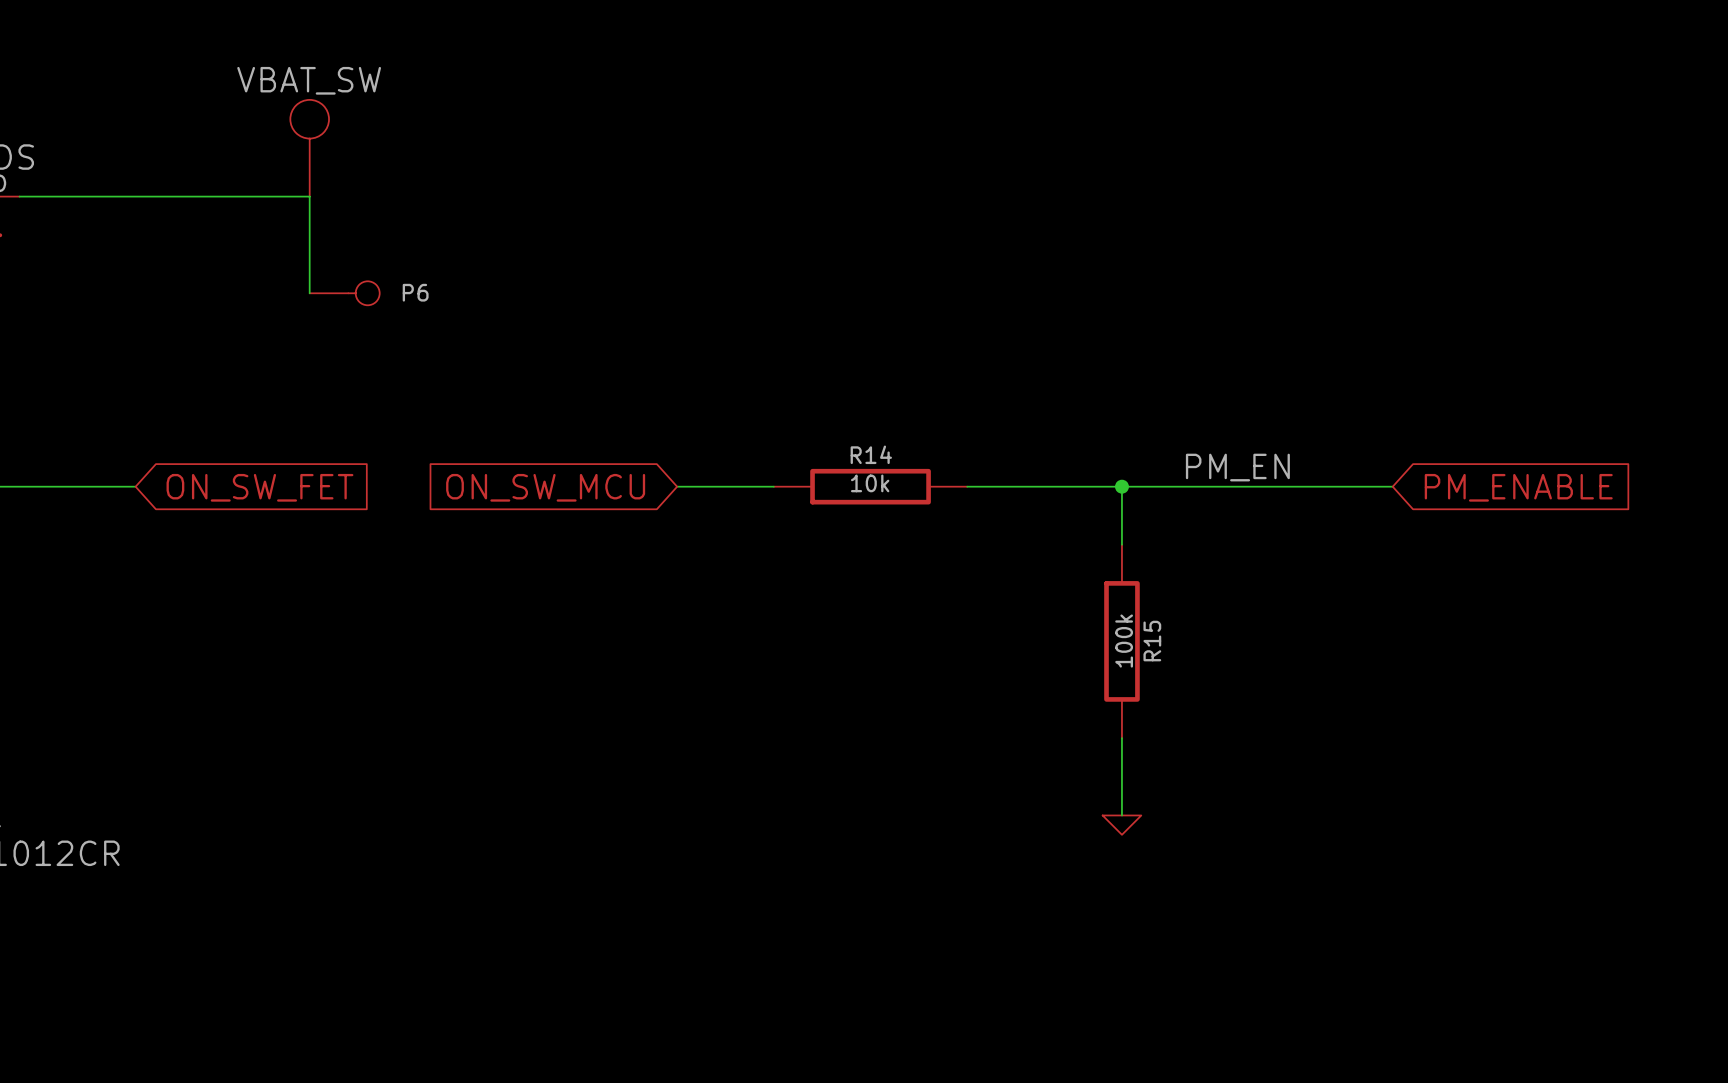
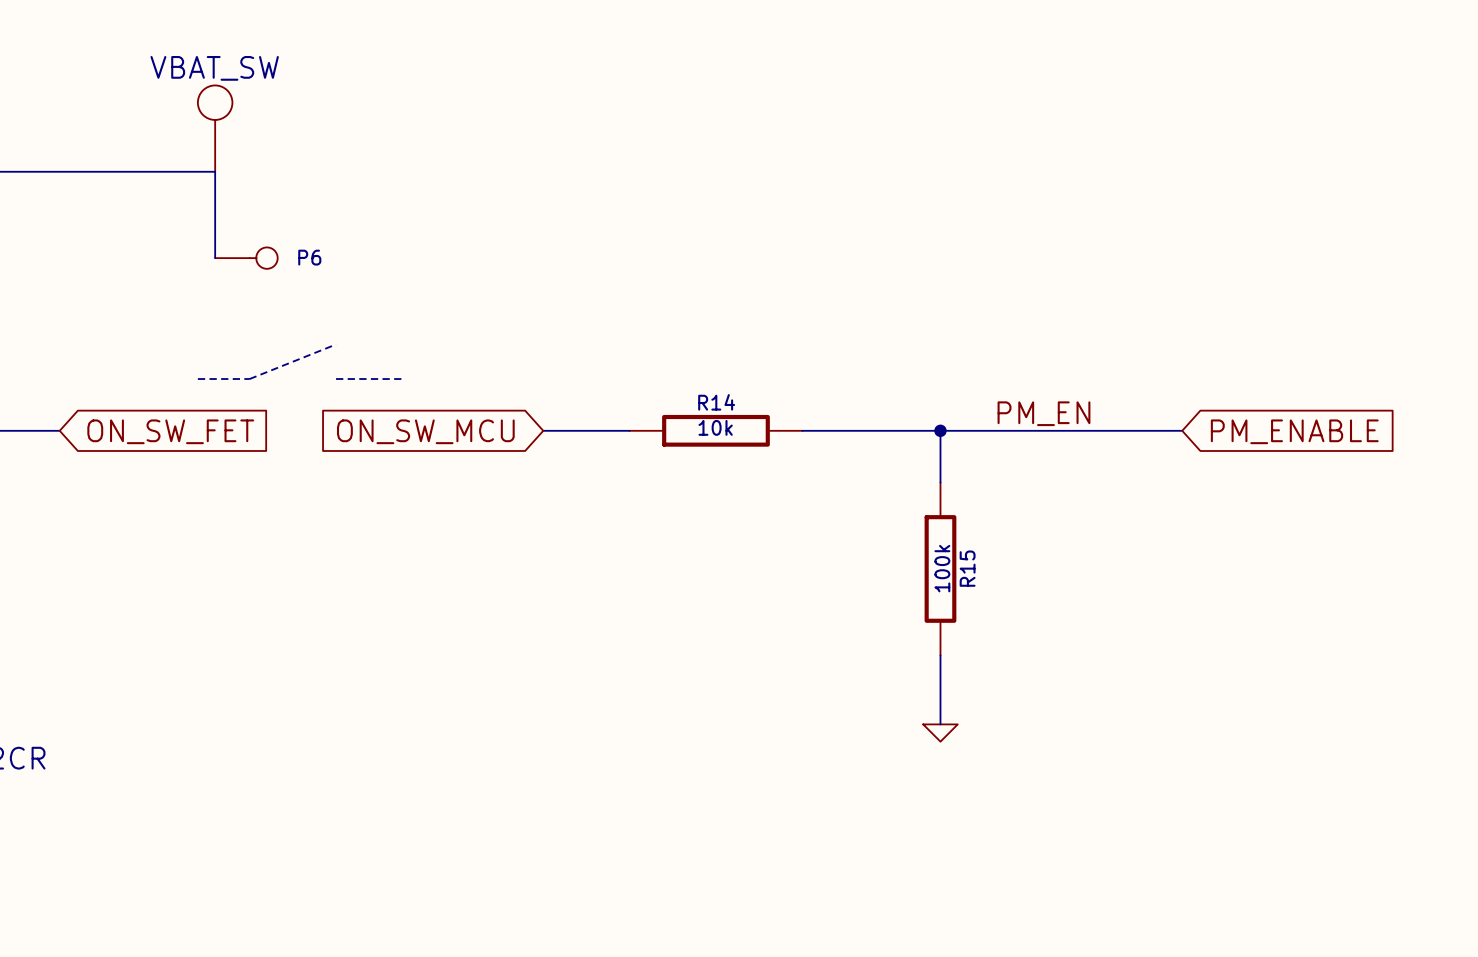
line: none -> (336, 344) (249, 379) (197, 379)
line: none -> (336, 379) (405, 379)

